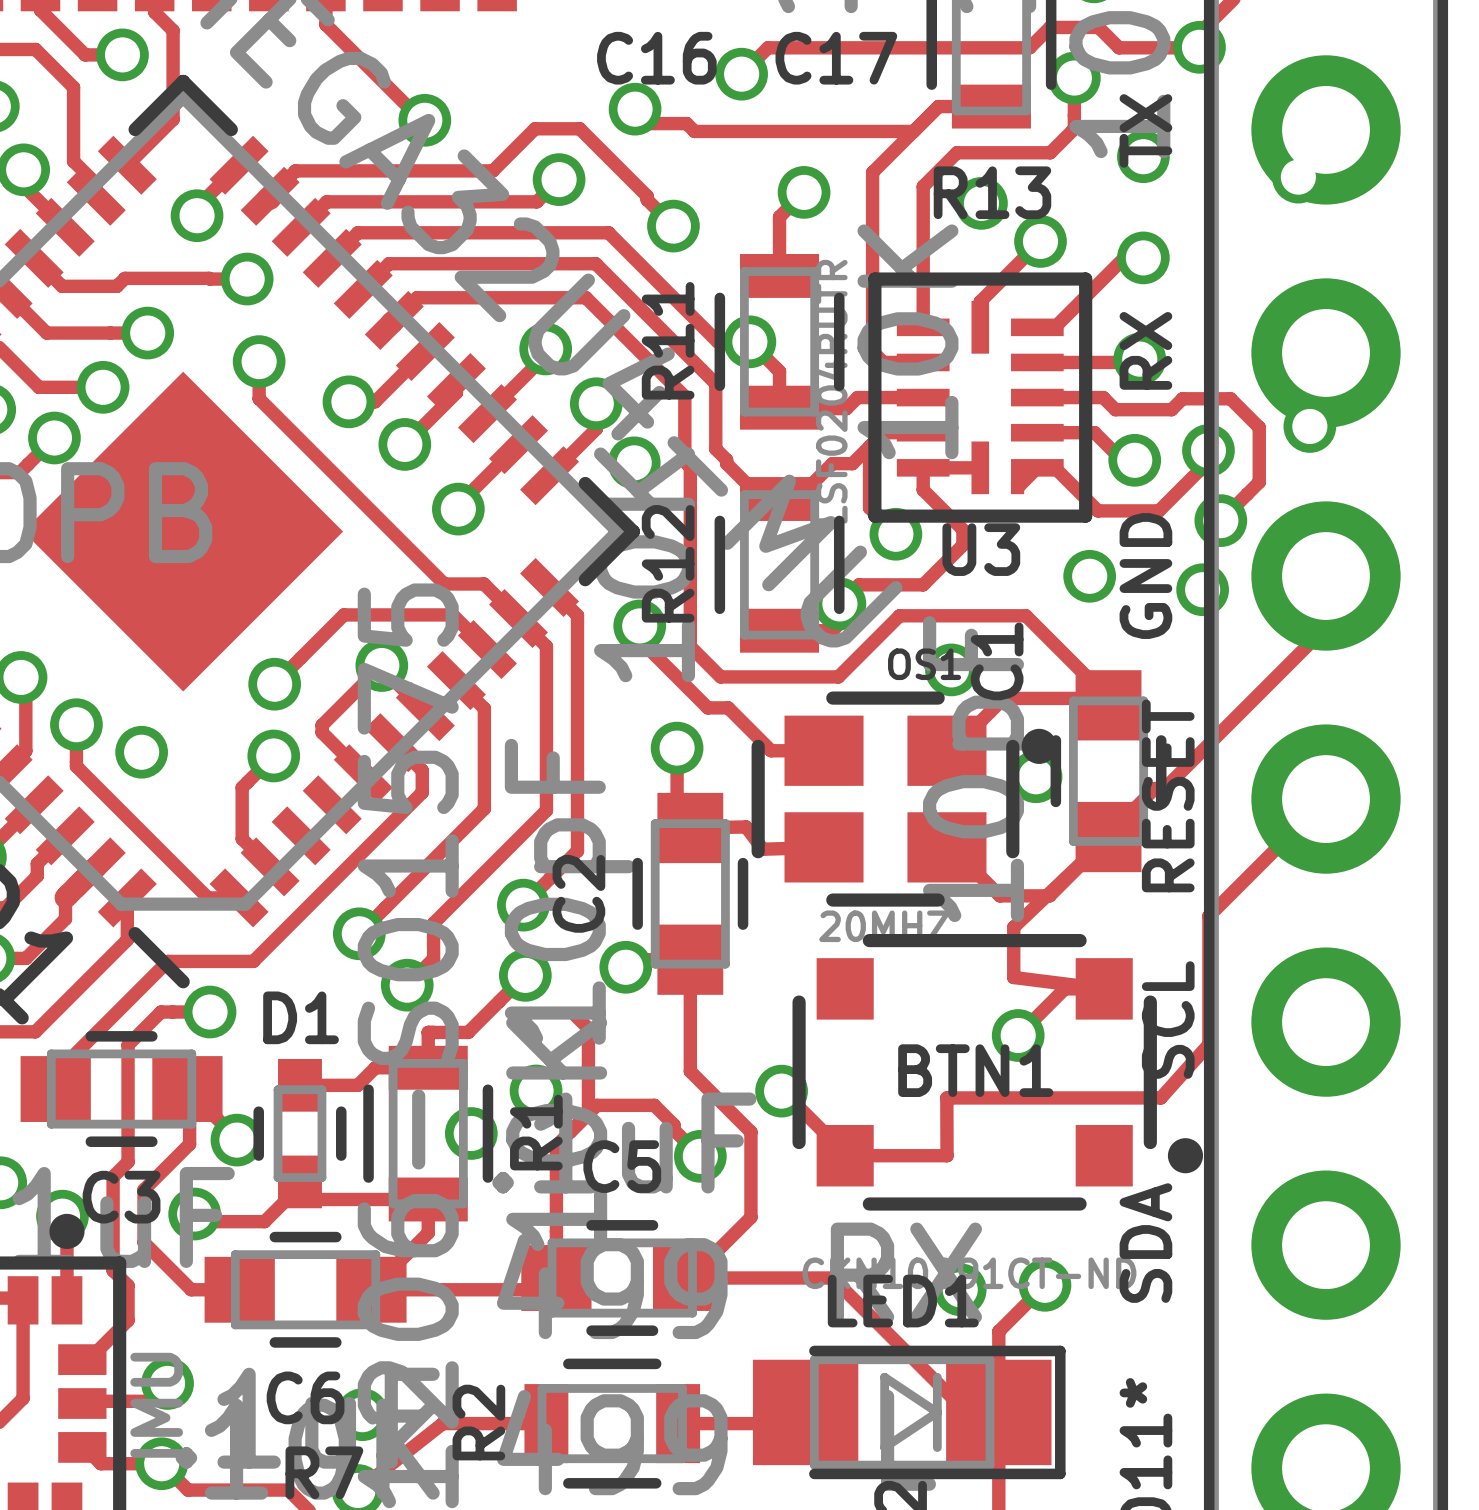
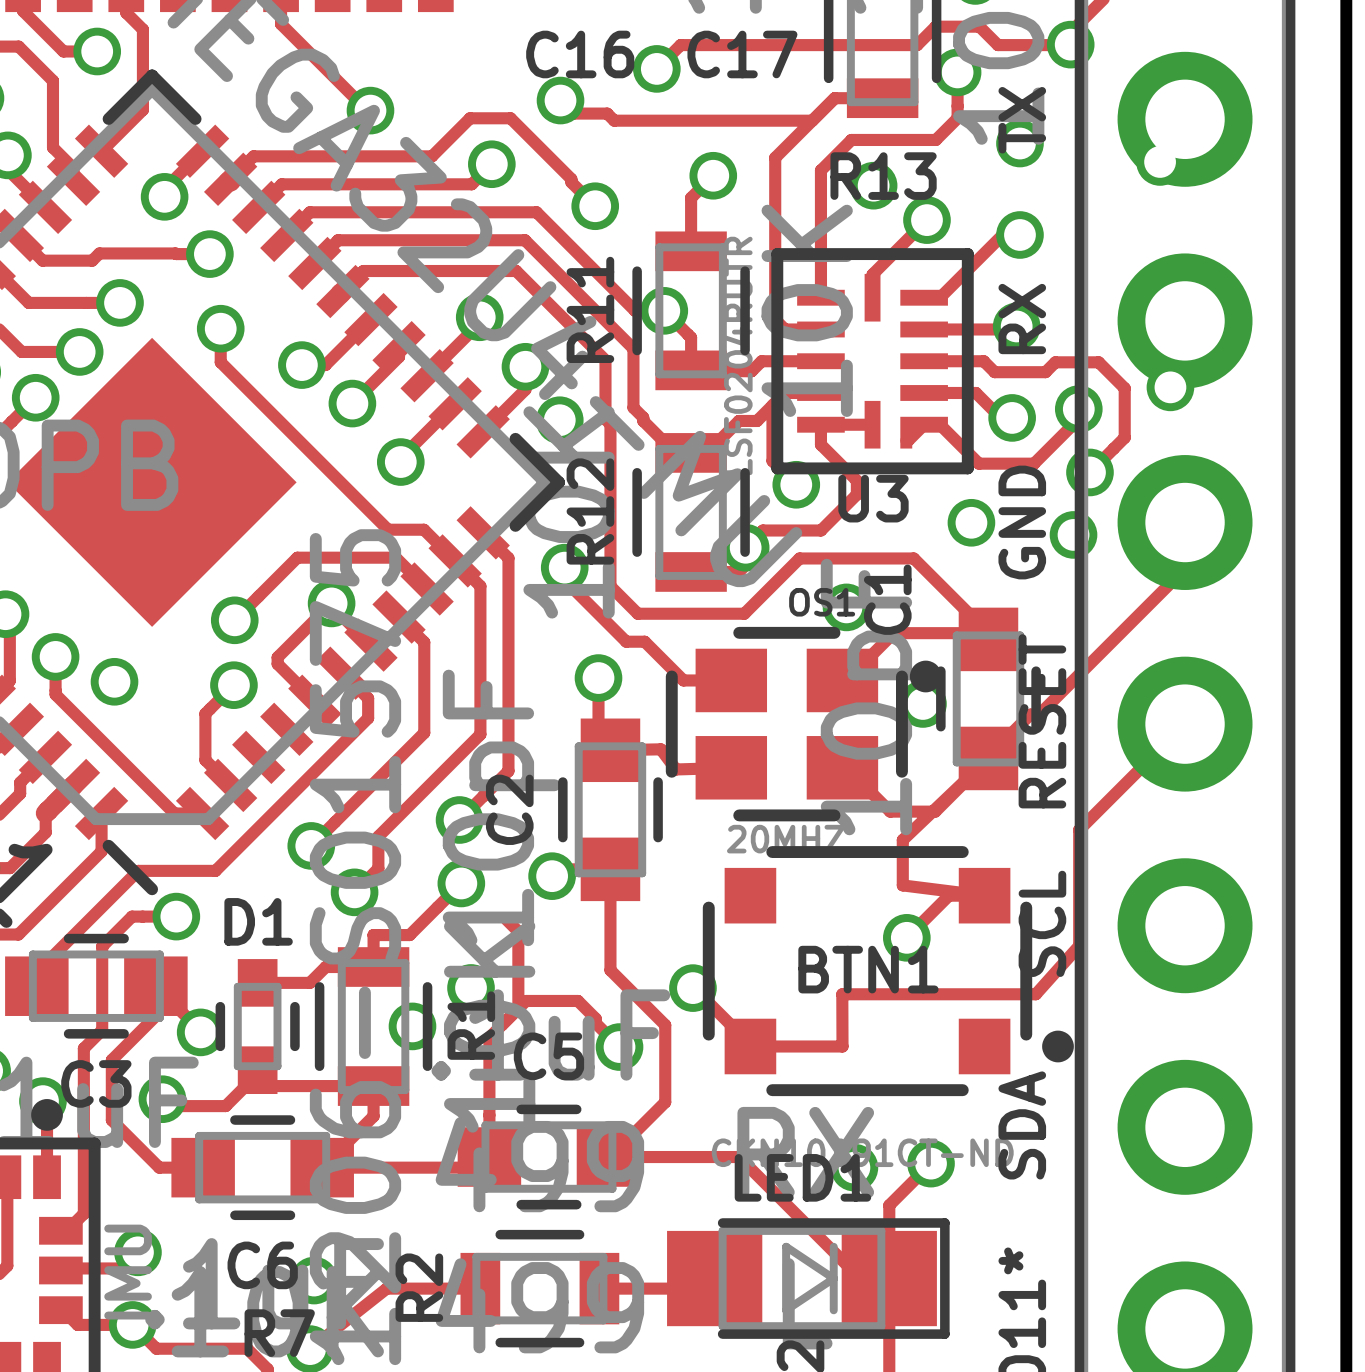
track: (189, 1119) (189, 1144) (144, 1189) (144, 1242) -> (157, 1014) (111, 1060) (111, 1120) (116, 1125)
track: (128, 1137) (128, 1161) (113, 1176) (113, 1270) (128, 1285) (128, 1320) (107, 1340) -> (102, 1030) (83, 1048) (83, 1213)

